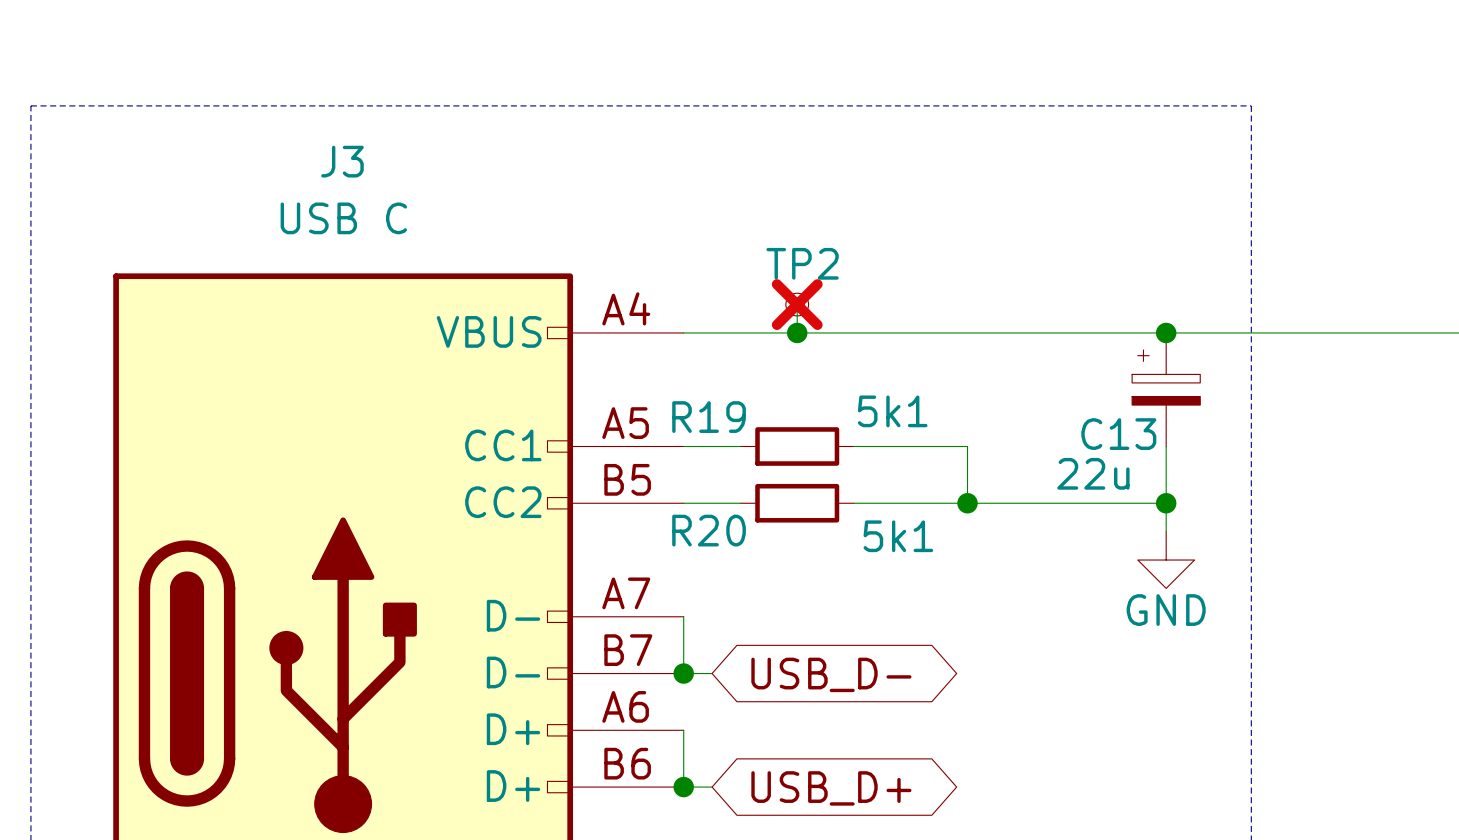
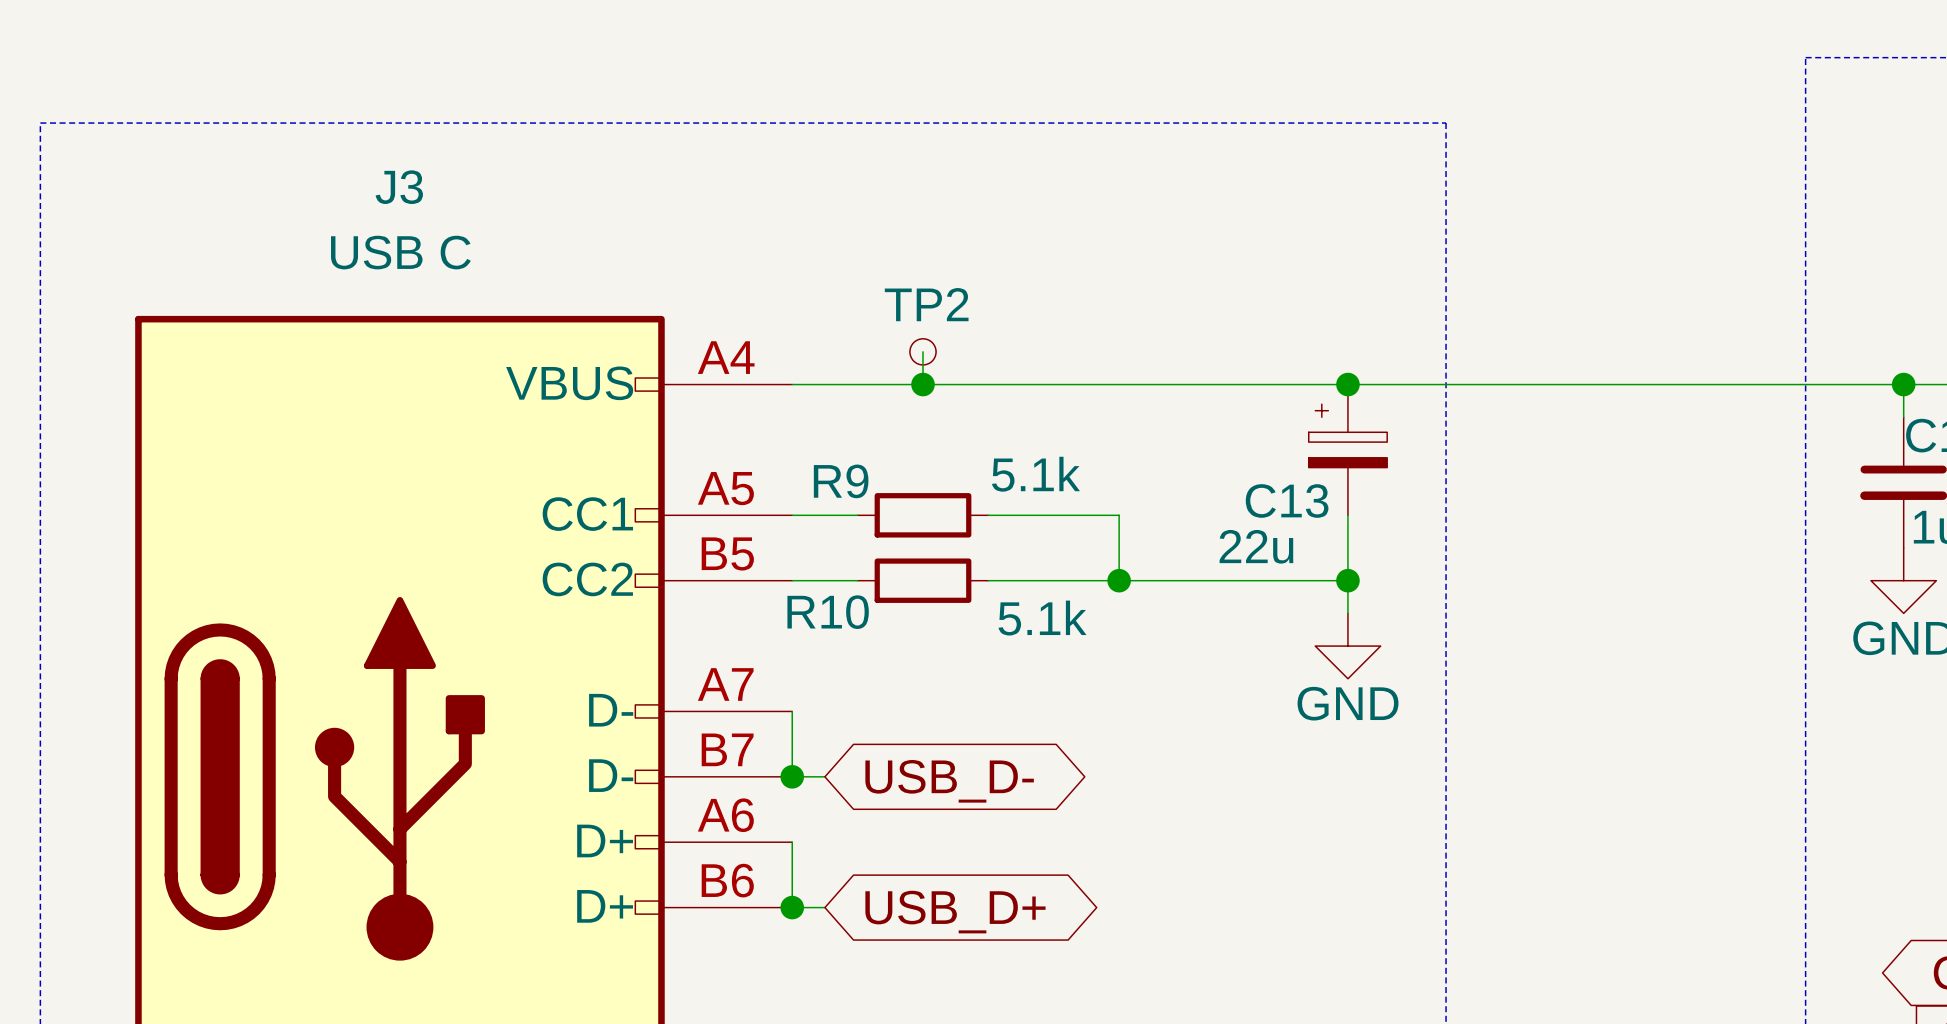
TP2 do-not-place cross: (797, 304) -> none
R19 value: 5k1 (892, 411) -> 5.1k (1035, 474)
R19 name: R19 (709, 417) -> R9 (841, 481)
R20 name: R20 (709, 530) -> R10 (828, 612)
R20 value: 5k1 (898, 536) -> 5.1k (1042, 618)

